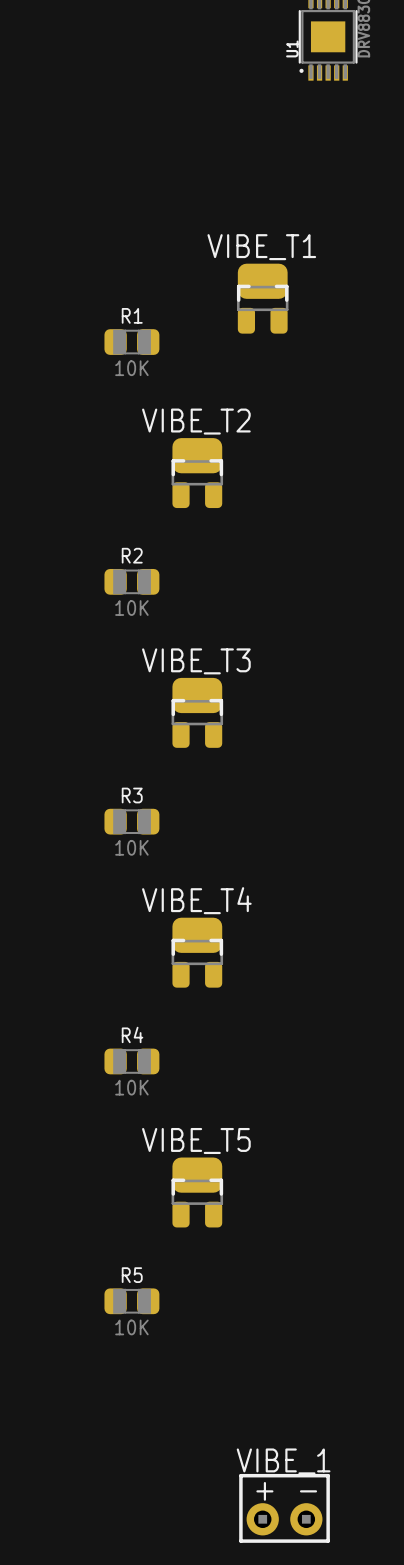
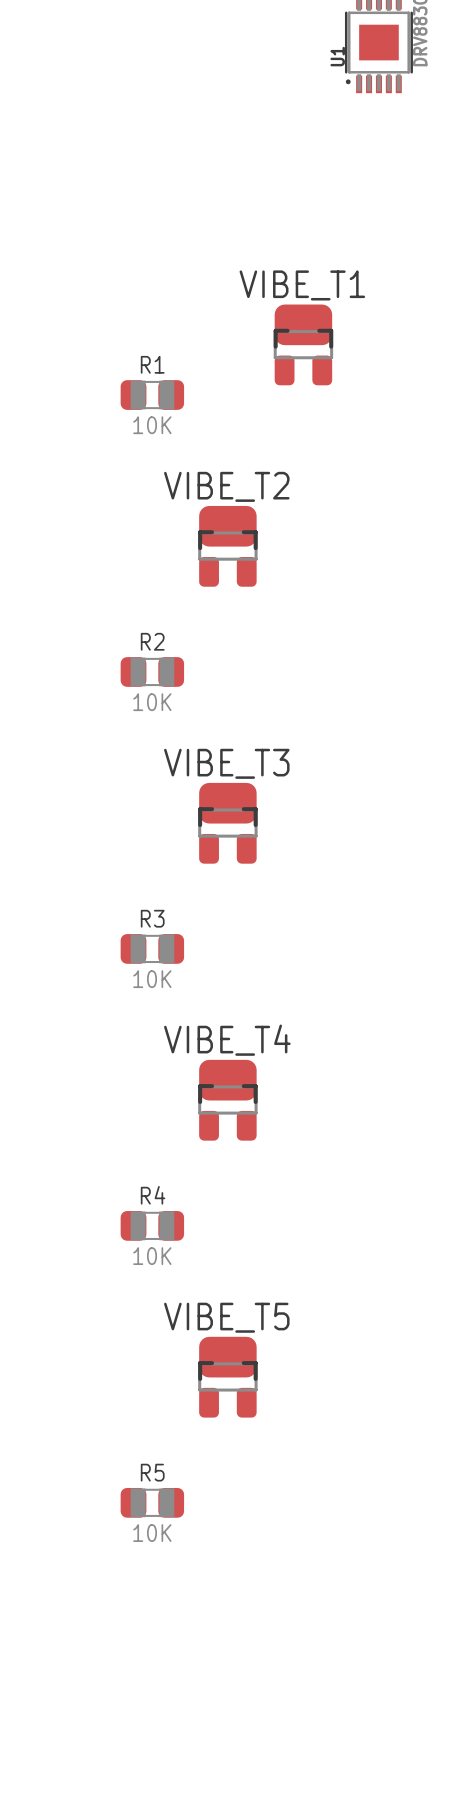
VIBE_1: (284, 1508) -> none

